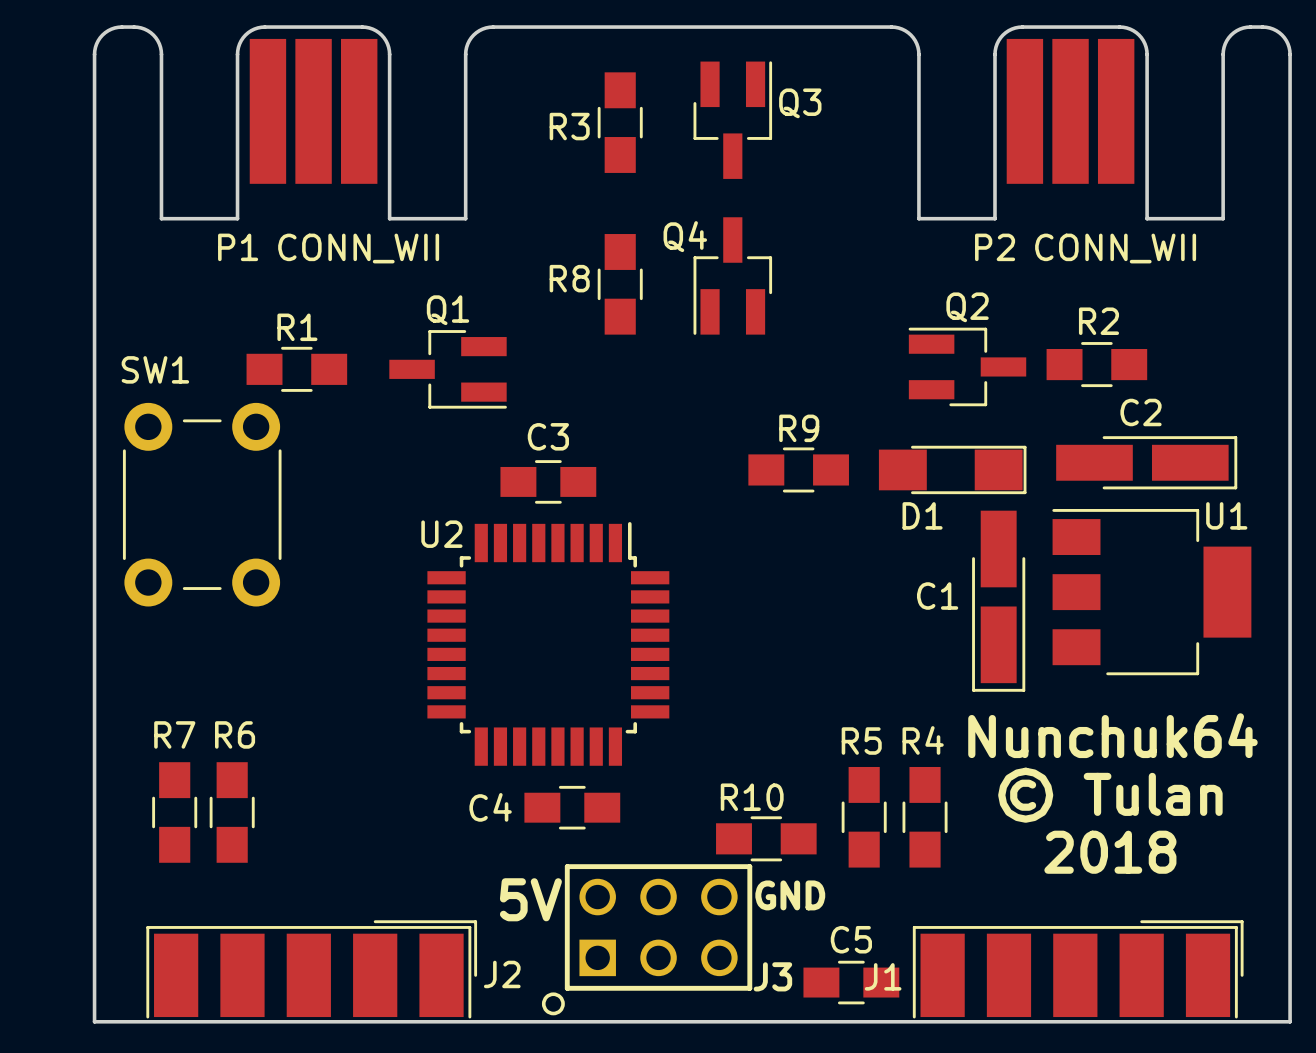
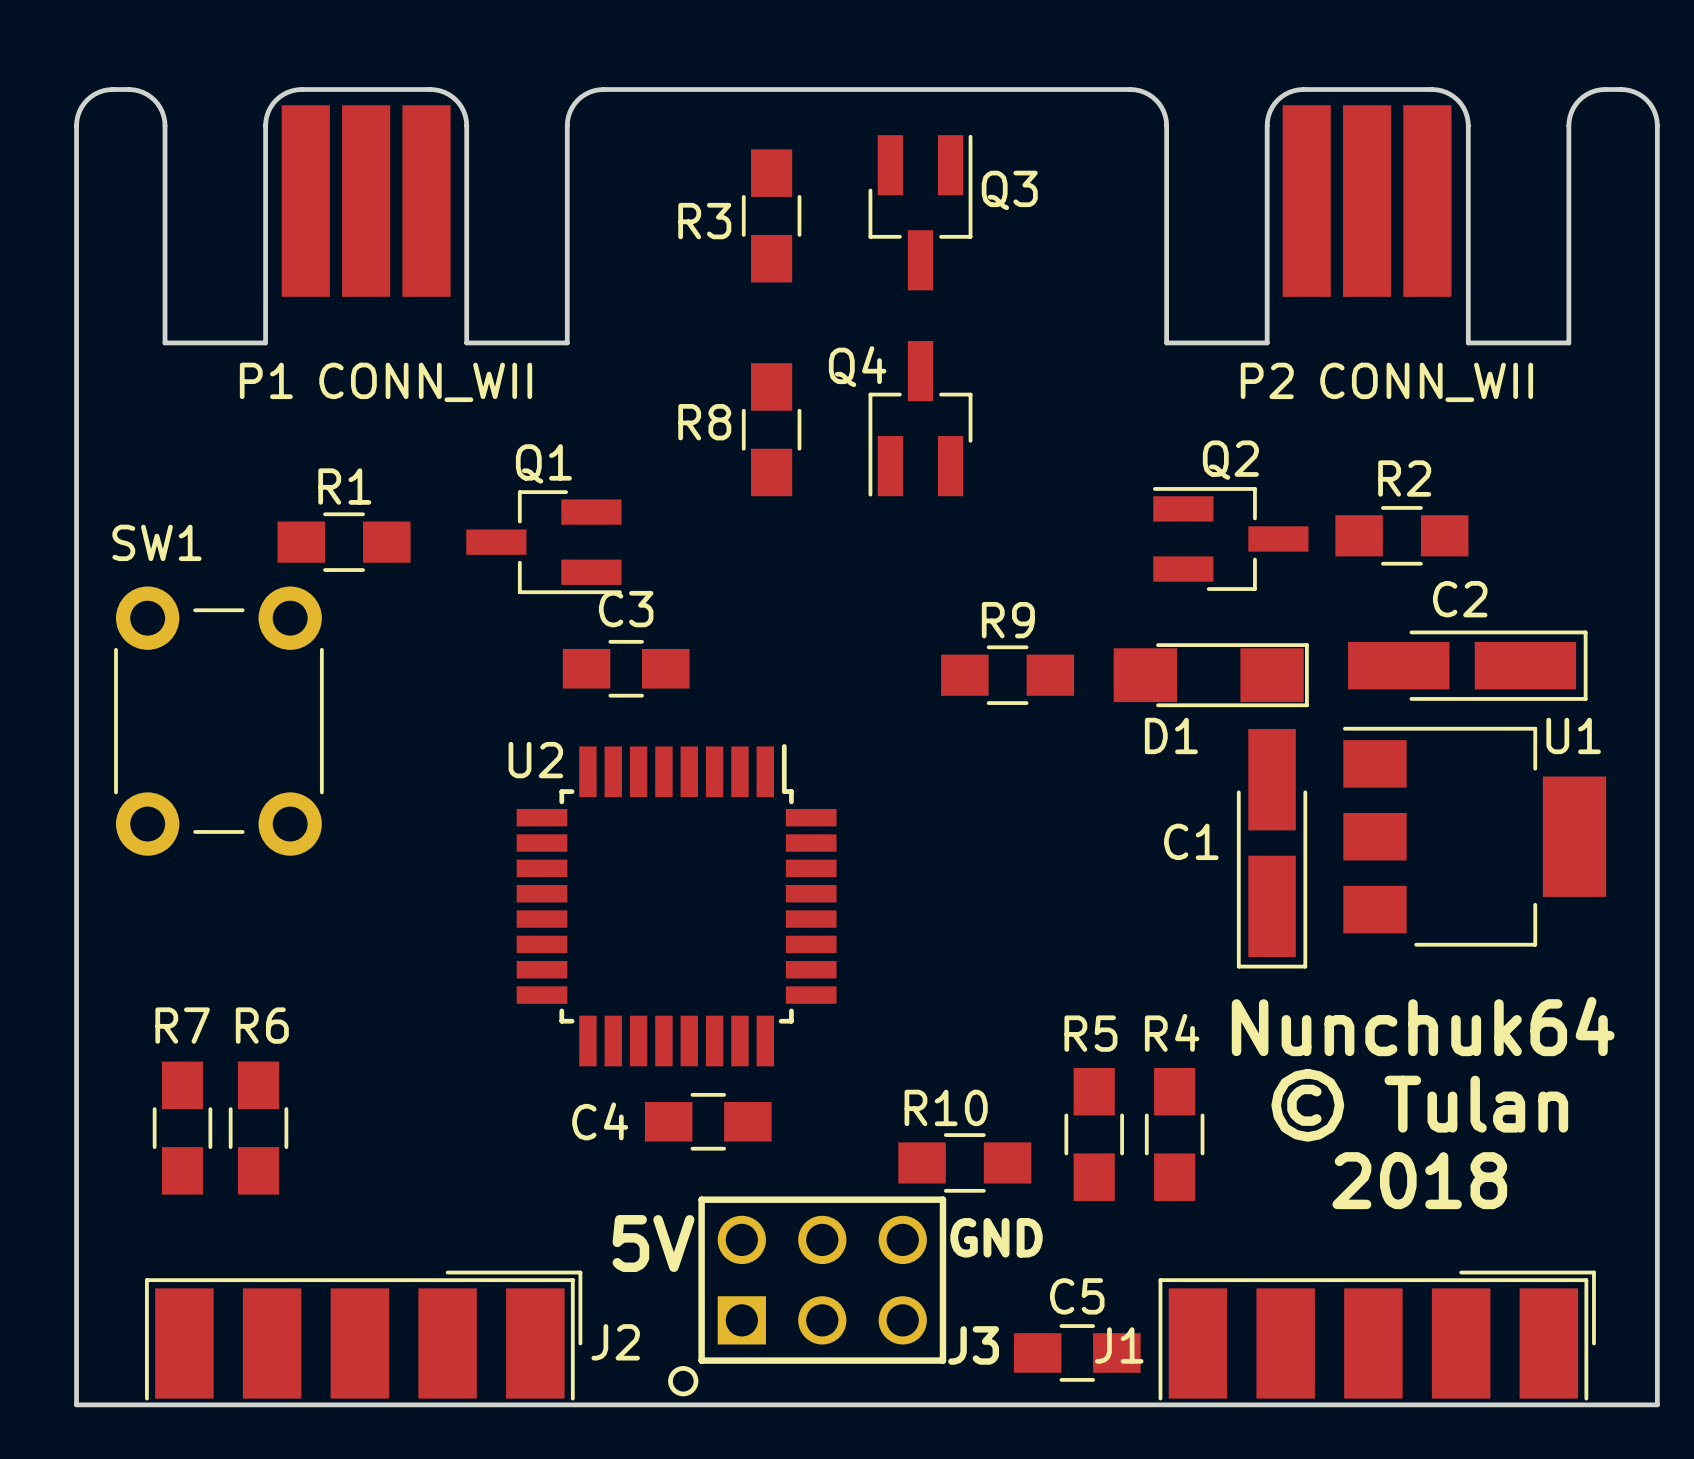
C3 position: (548, 481) -> (626, 668)

